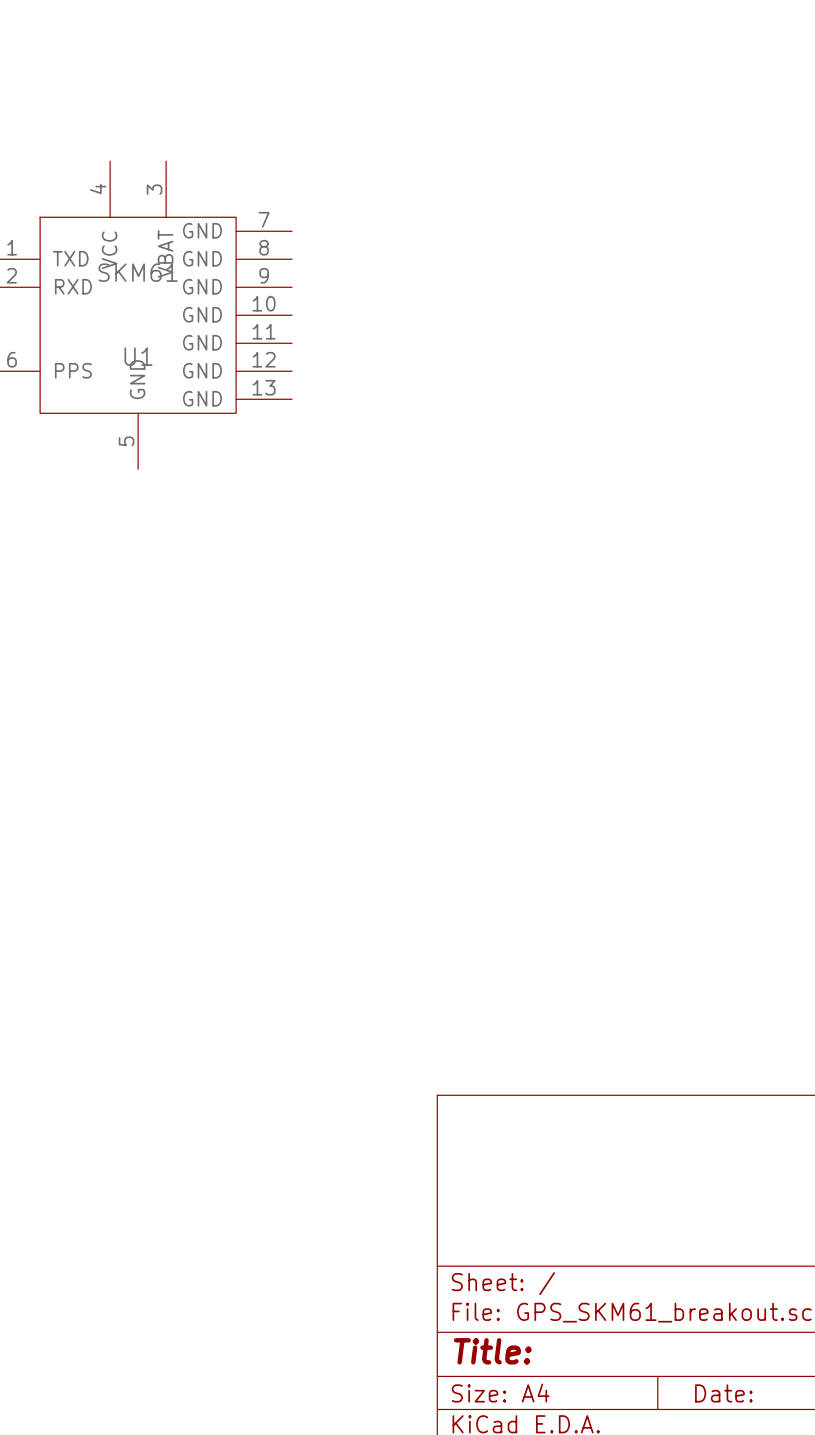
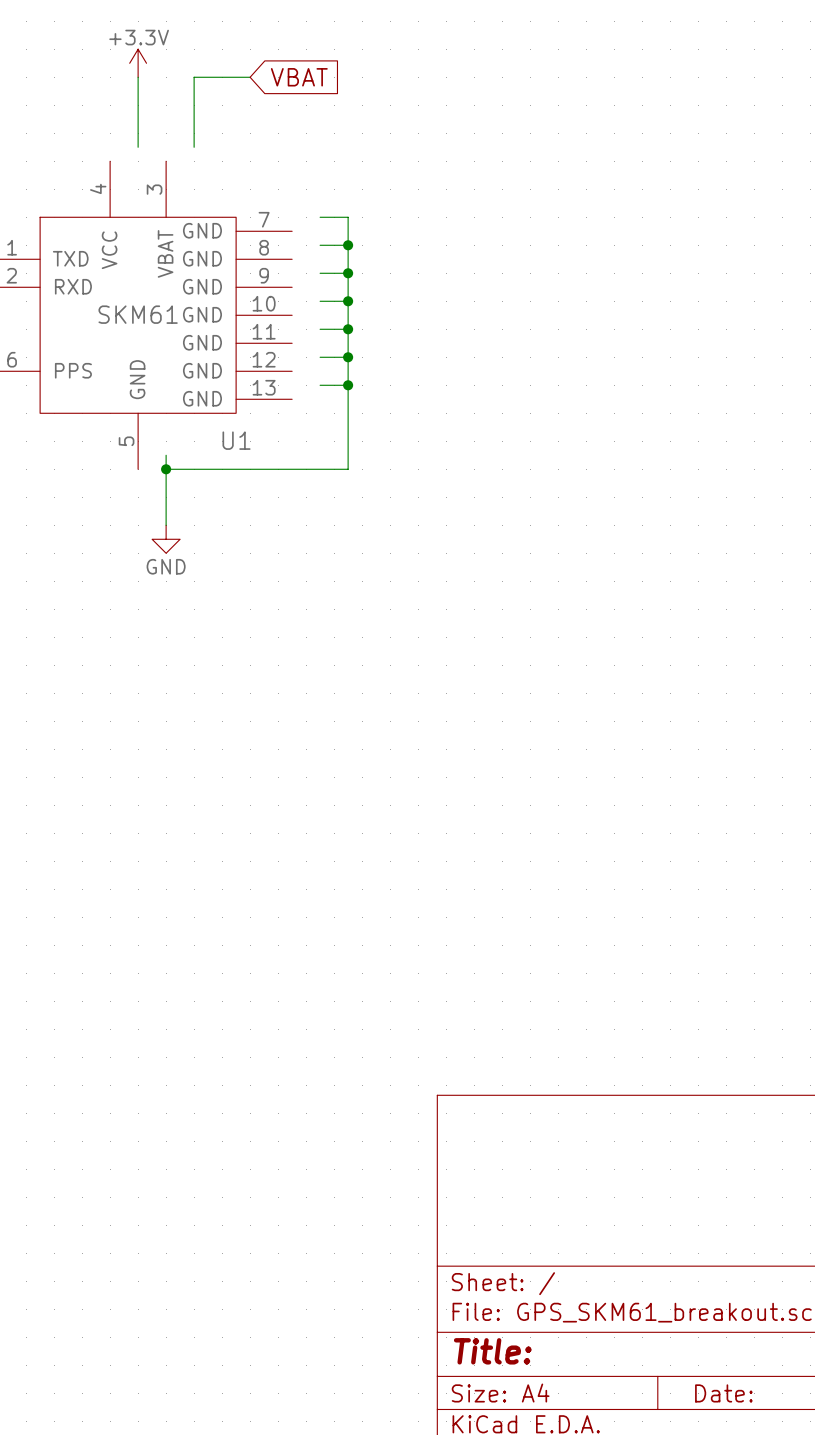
power symbol: none -> +3.3V (138, 63)
wire: none -> (138, 77) (138, 147)
wire: none -> (250, 77) (194, 77) (194, 147)
global label: none -> VBAT (299, 77)
wire: none -> (320, 217) (348, 217) (348, 469) (166, 469)
wire: none -> (320, 245) (348, 245)
junction: none -> (348, 245)
U1 value position: SKM61 (138, 272) -> SKM61 (138, 314)
wire: none -> (320, 273) (348, 273)
junction: none -> (348, 273)
wire: none -> (320, 301) (348, 301)
junction: none -> (348, 301)
wire: none -> (320, 329) (348, 329)
junction: none -> (348, 329)
U1 name position: U1 (138, 356) -> U1 (236, 440)
wire: none -> (320, 357) (348, 357)
junction: none -> (348, 357)
wire: none -> (320, 385) (348, 385)
junction: none -> (348, 385)
wire: none -> (166, 455) (166, 525)
junction: none -> (166, 469)
power symbol: none -> GND (166, 539)

